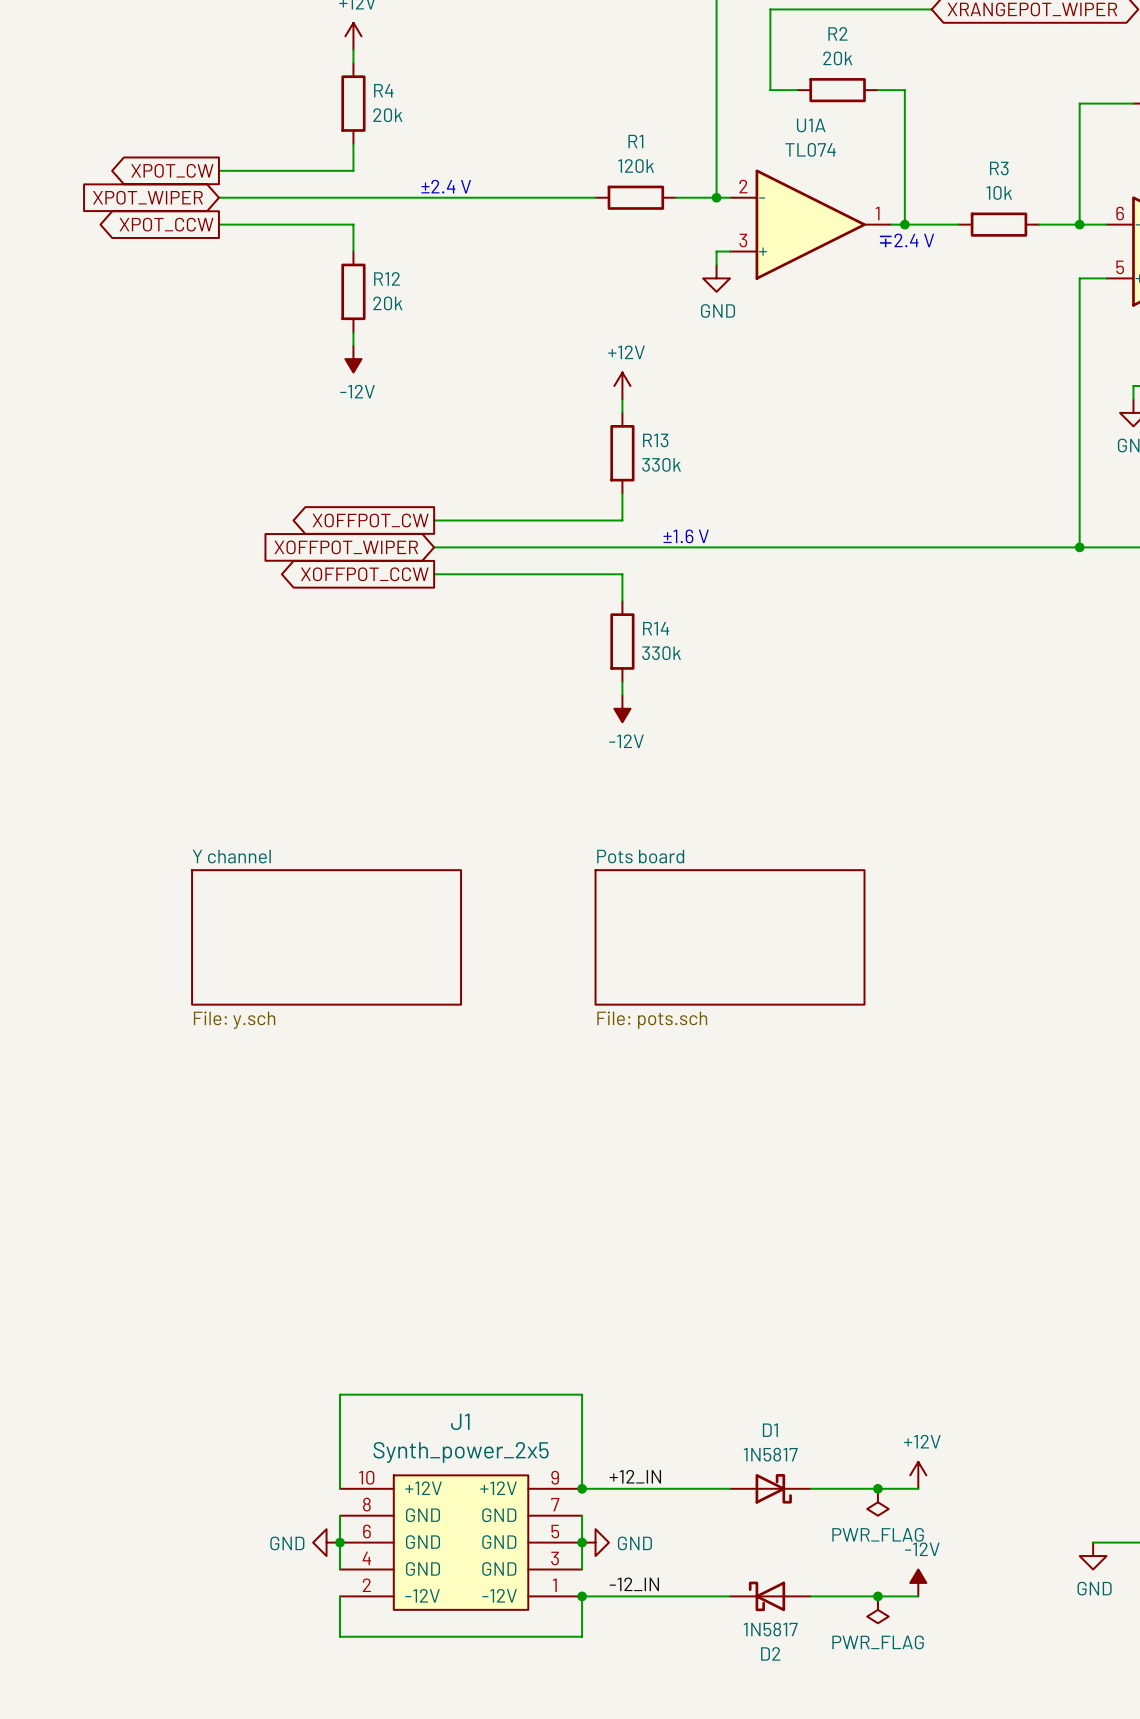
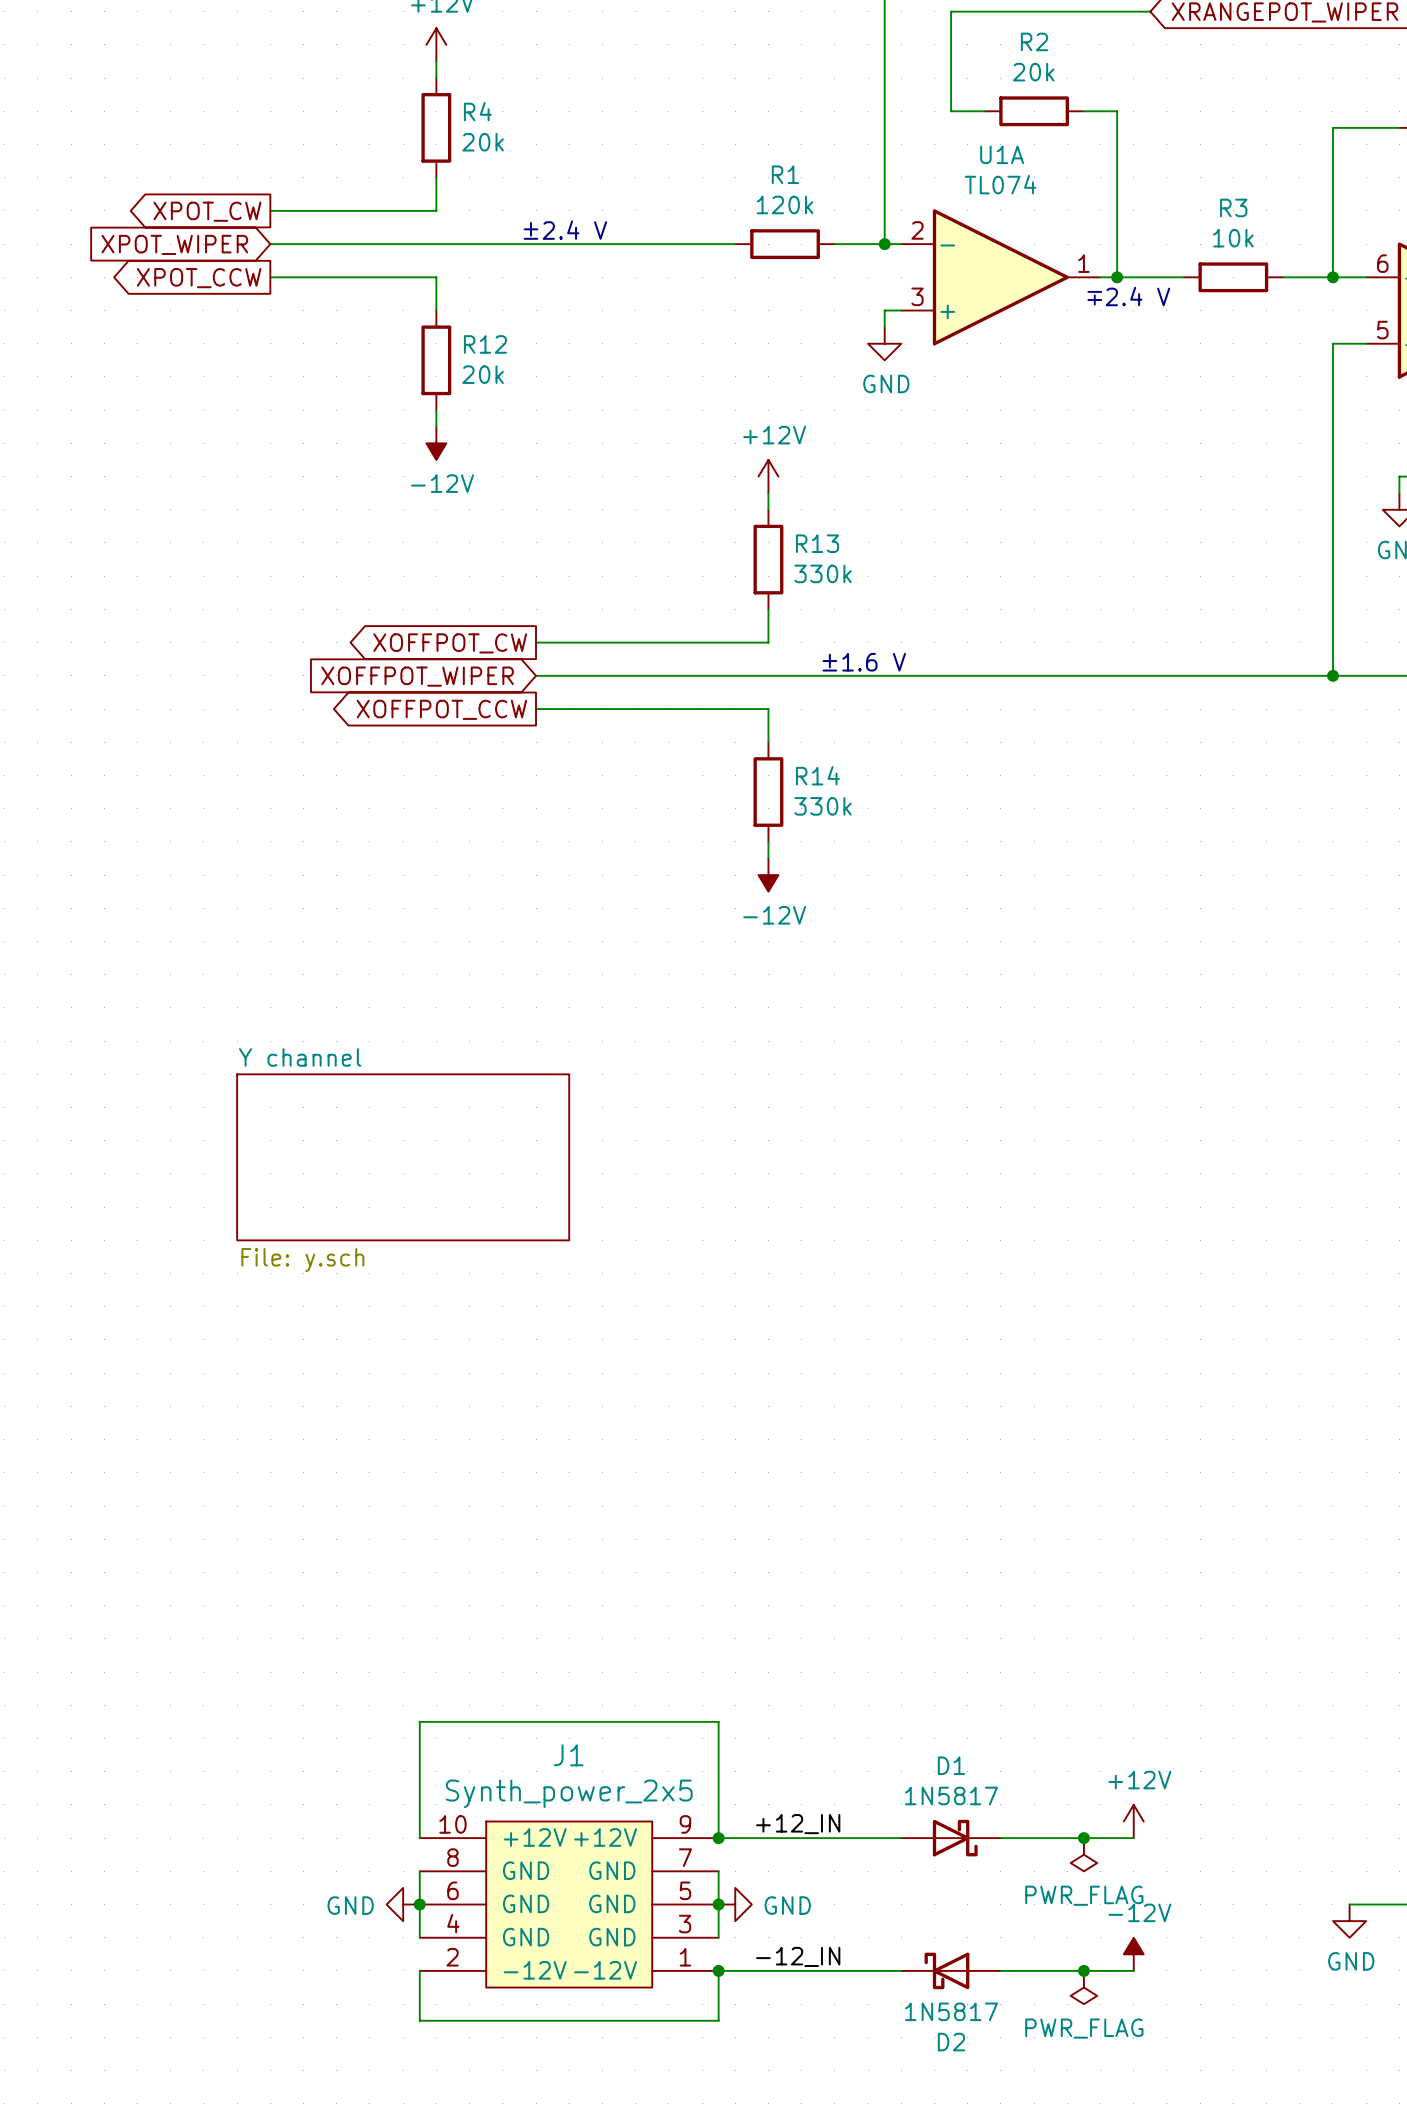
sheet Pots board: File: pots.sch (730, 937) -> none

